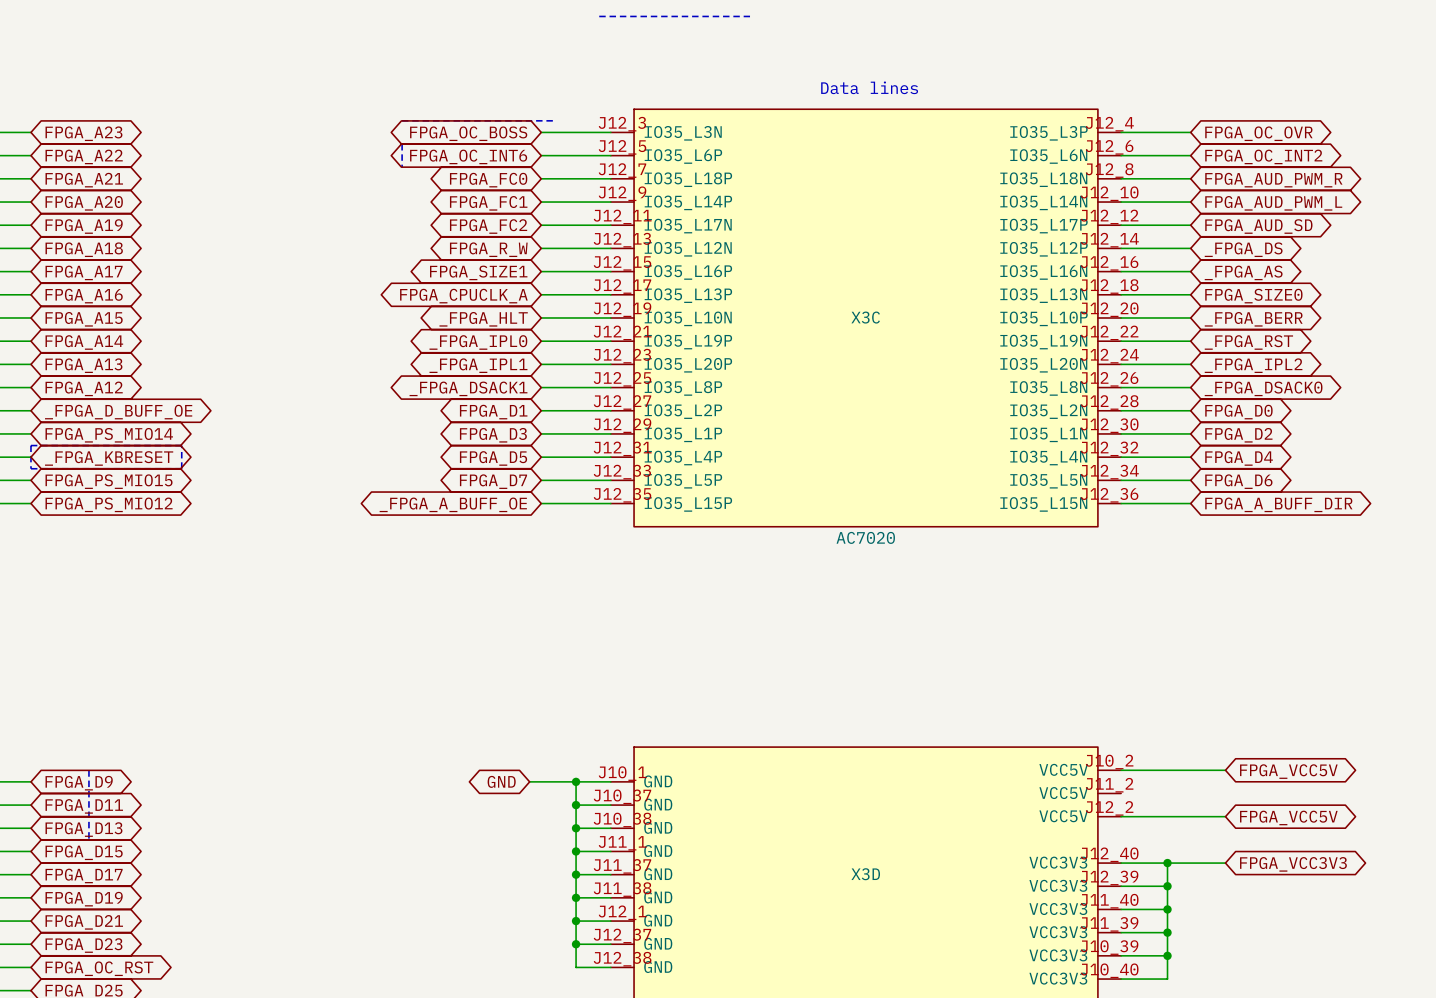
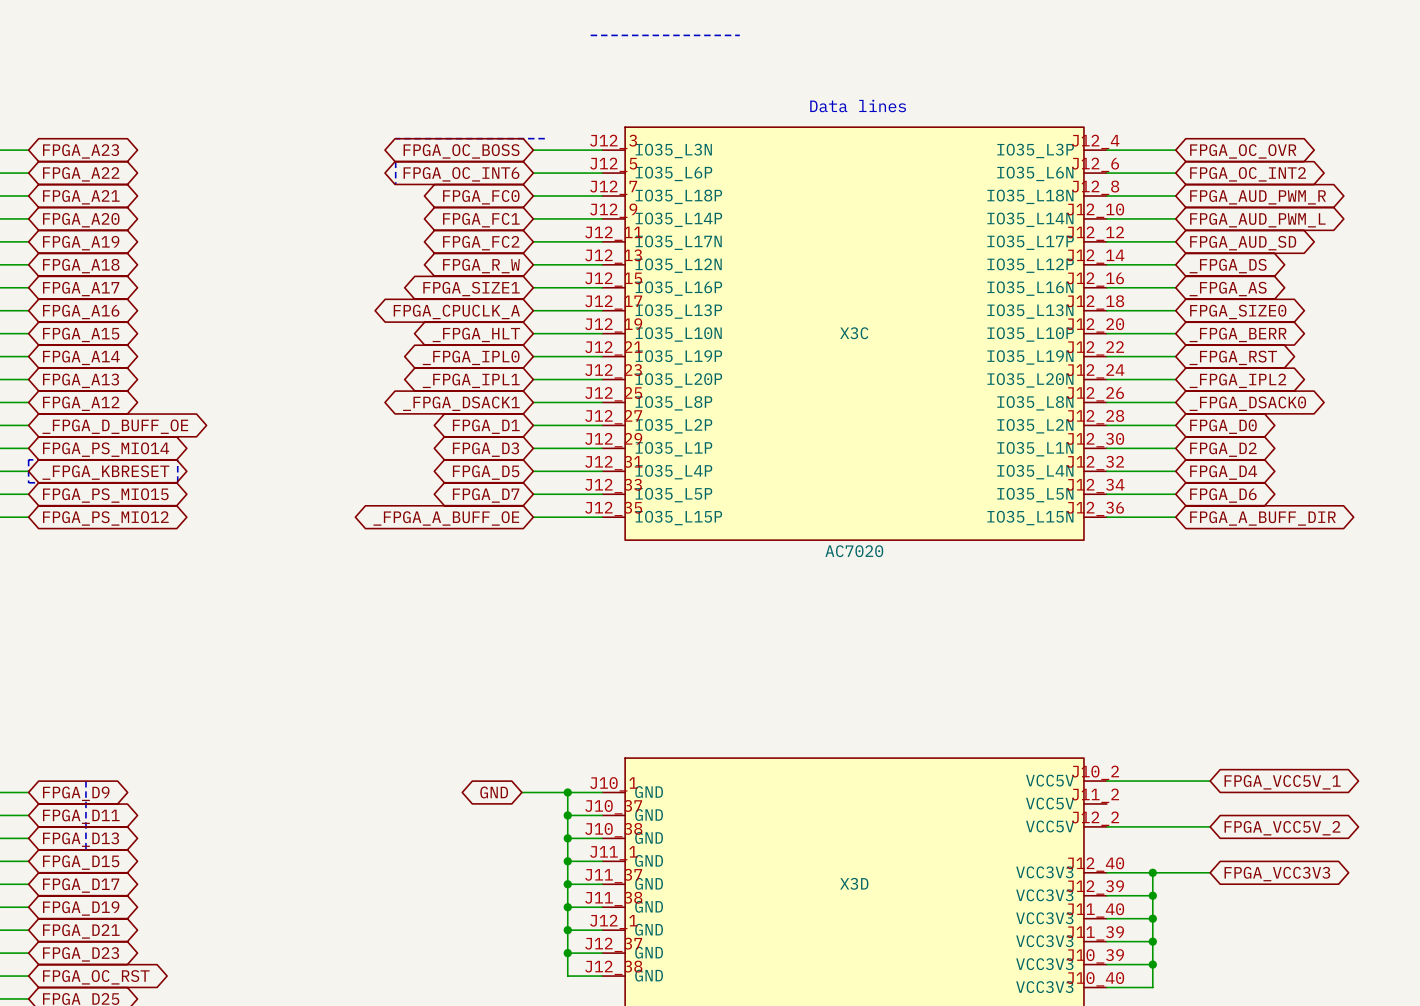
global label: FPGA_VCC5V (1288, 771) -> FPGA_VCC5V_1 (1282, 782)
global label: FPGA_VCC5V (1288, 817) -> FPGA_VCC5V_2 (1282, 828)

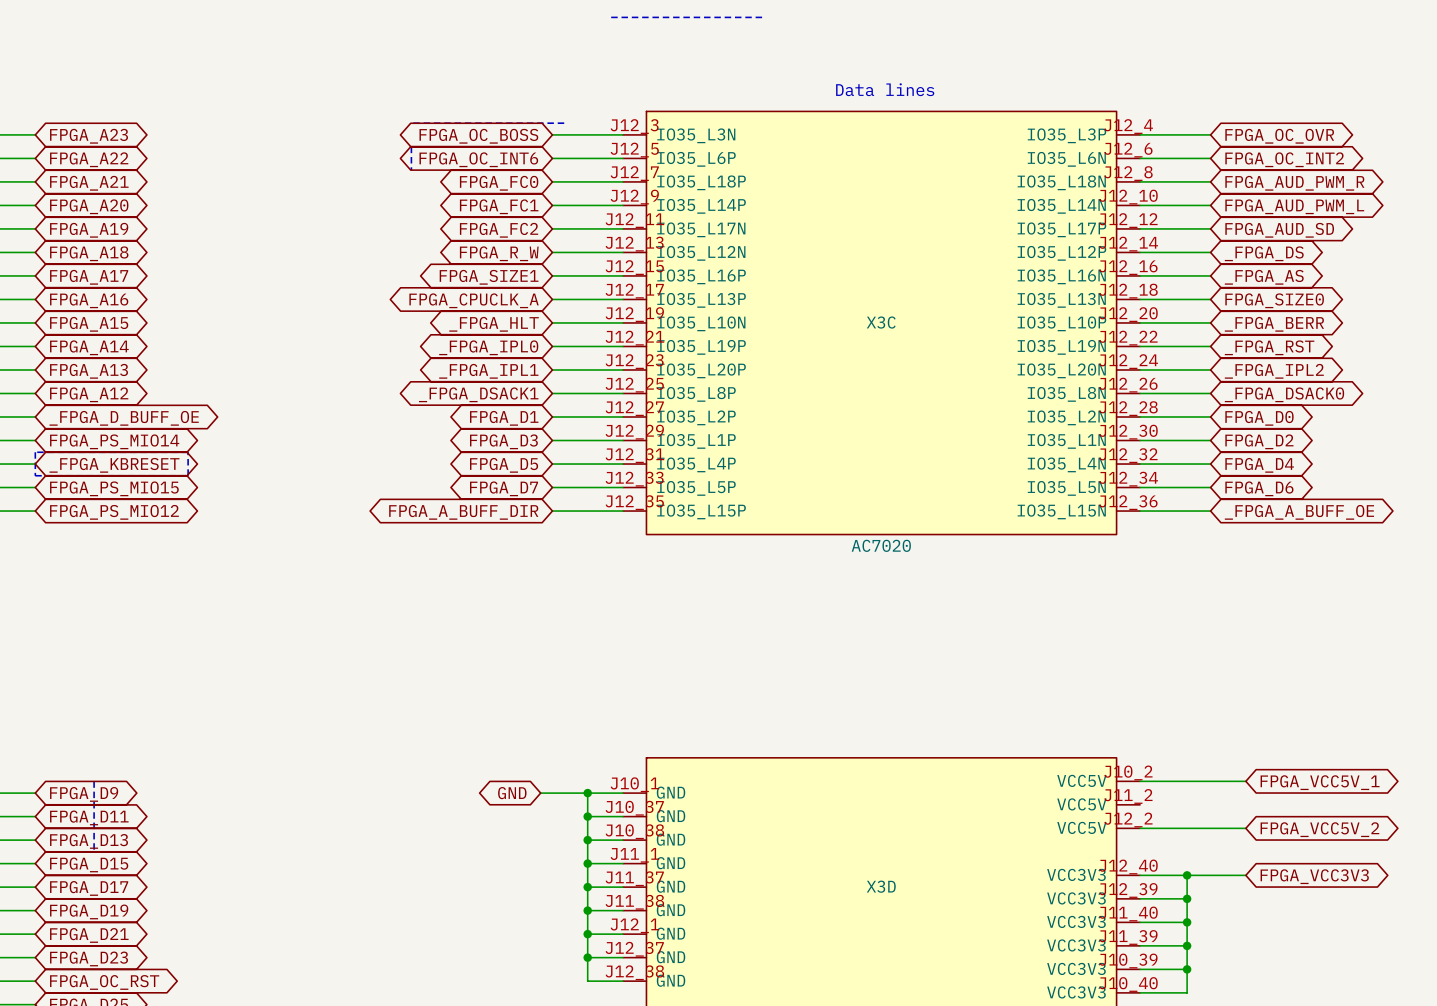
global label: _FPGA_A_BUFF_OE (446, 518) -> FPGA_A_BUFF_DIR (463, 512)
global label: FPGA_A_BUFF_DIR (1262, 518) -> _FPGA_A_BUFF_OE (1299, 512)

